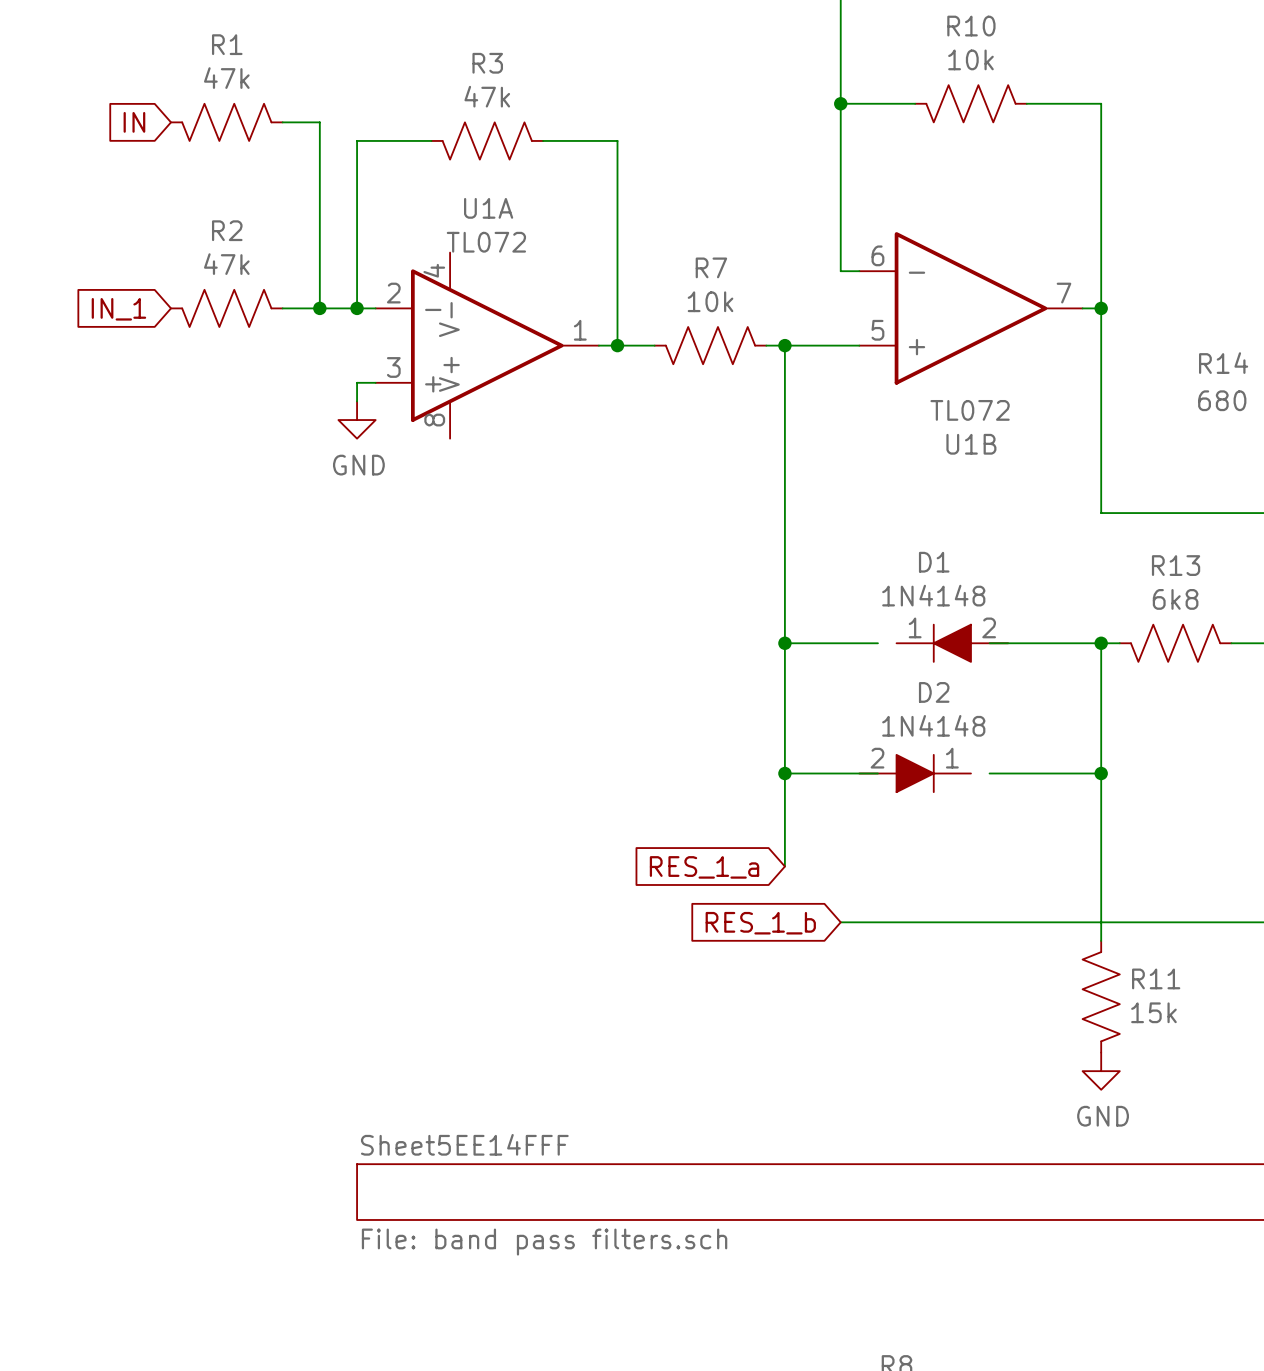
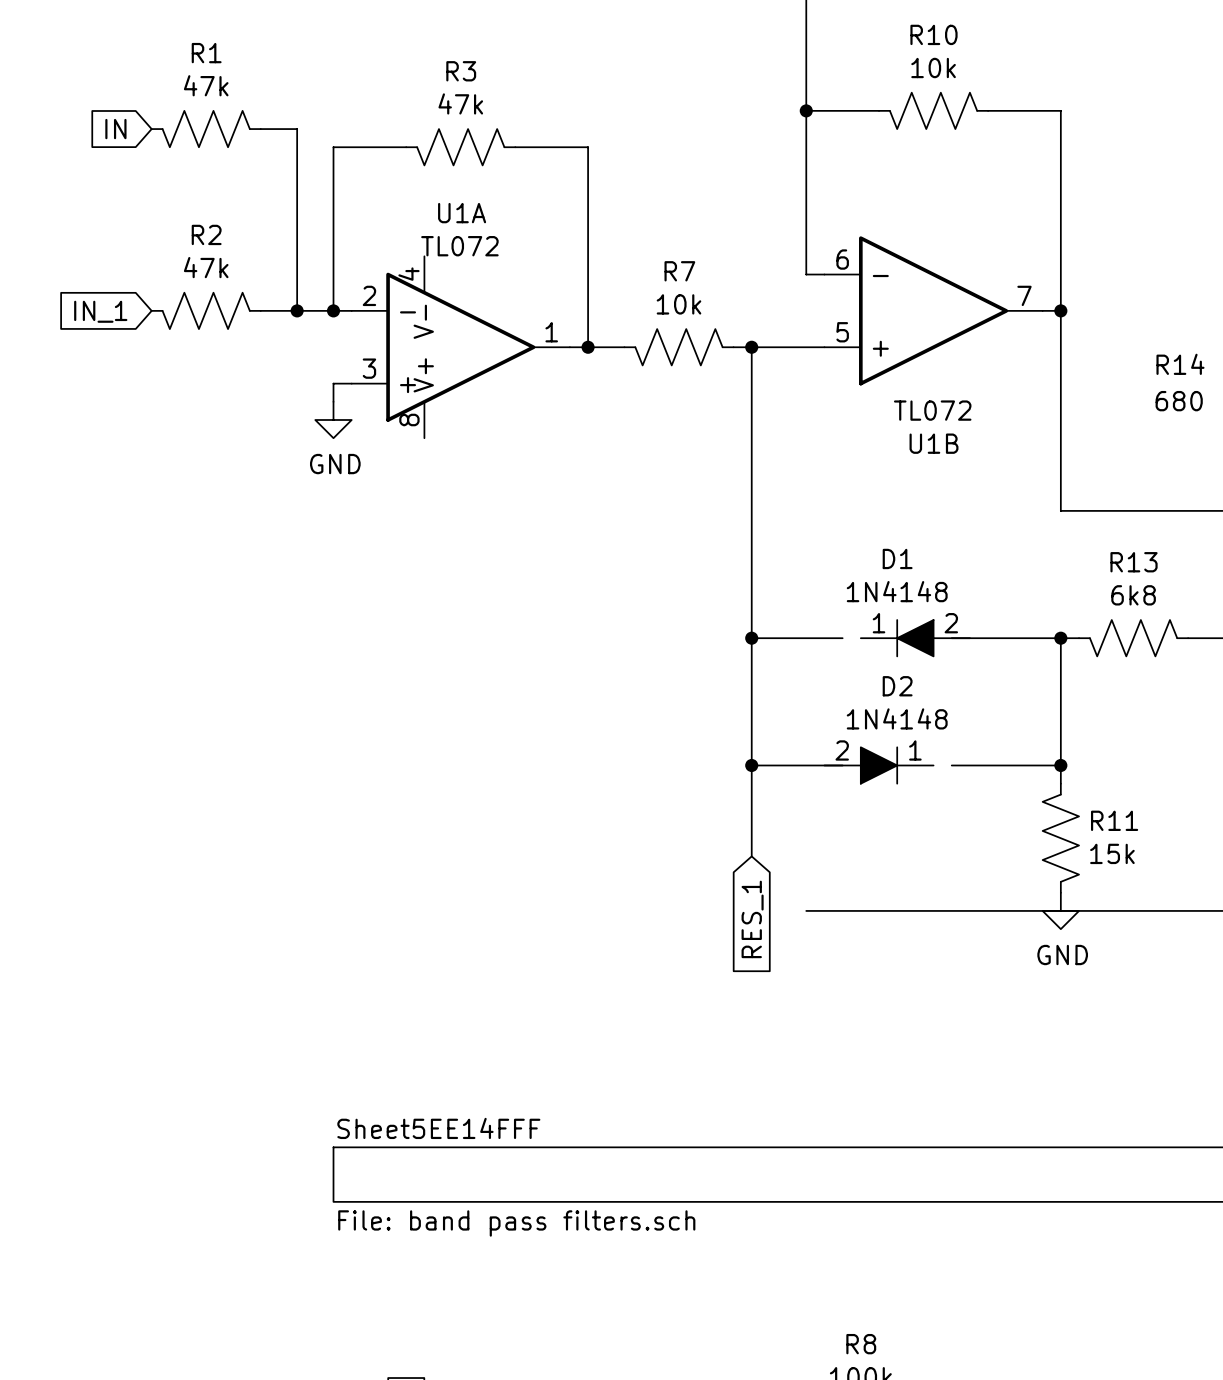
wire: (1101, 792) (1101, 940) -> none
global label: RES_1_a (704, 867) -> RES_1 (752, 919)
global label: RES_1_b (760, 923) -> none
R11 position: (1101, 996) -> (1060, 838)
power symbol position: GND (1101, 1071) -> GND (1060, 910)

